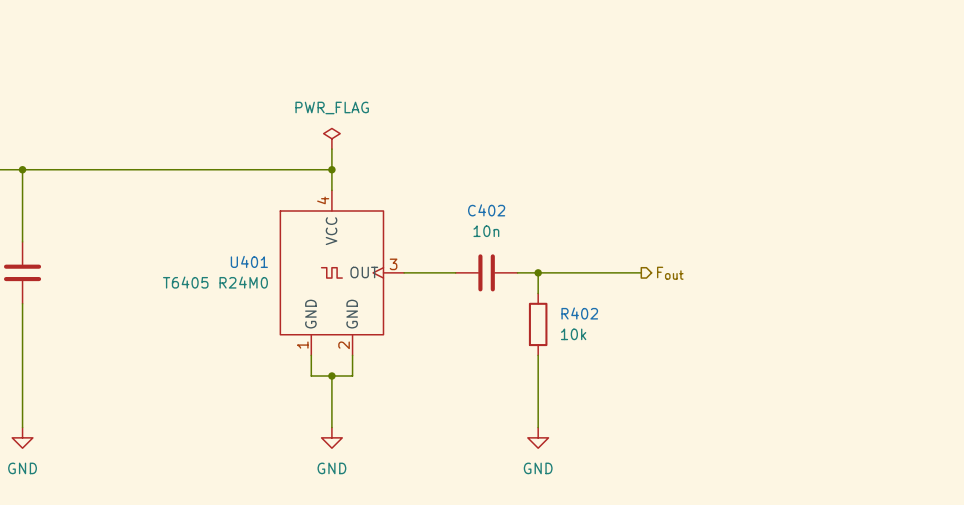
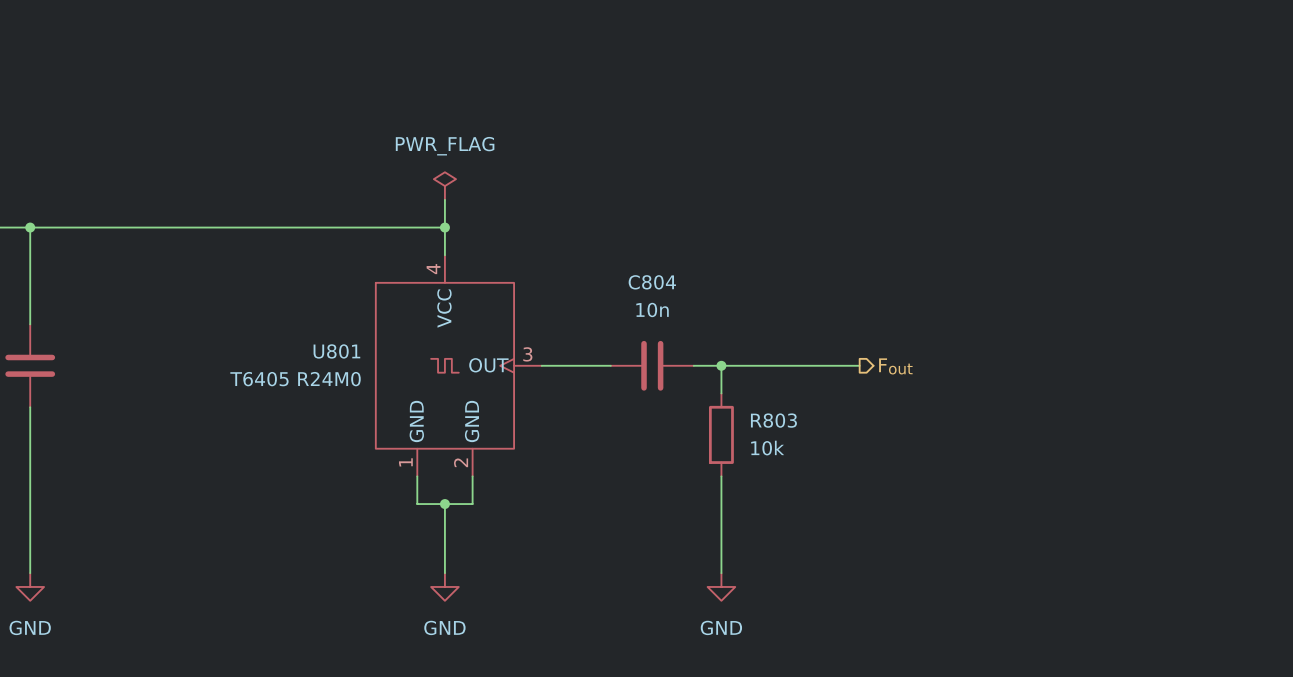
C402 name: C402 (486, 210) -> C804 (652, 282)
U401 name: U401 (249, 261) -> U801 (336, 351)
R402 name: R402 (579, 313) -> R803 (773, 420)

